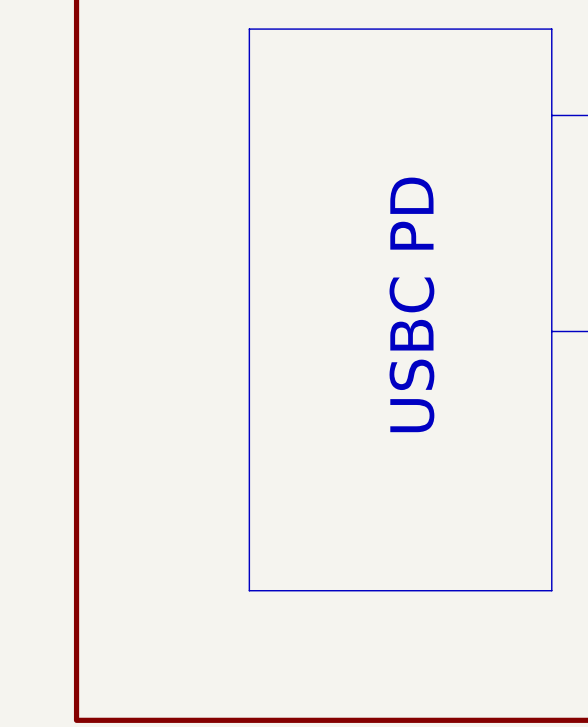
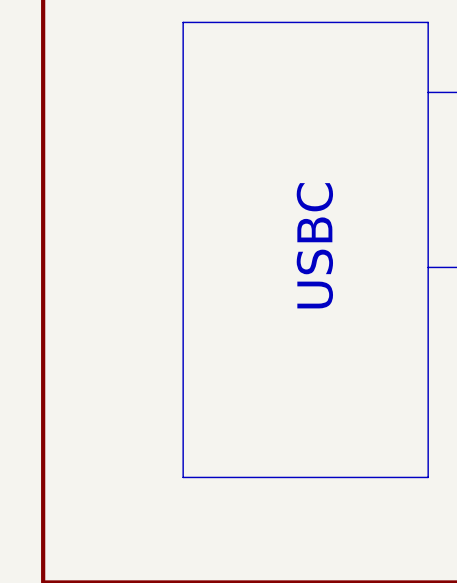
text: USBC PD (411, 304) -> USBC (314, 245)

